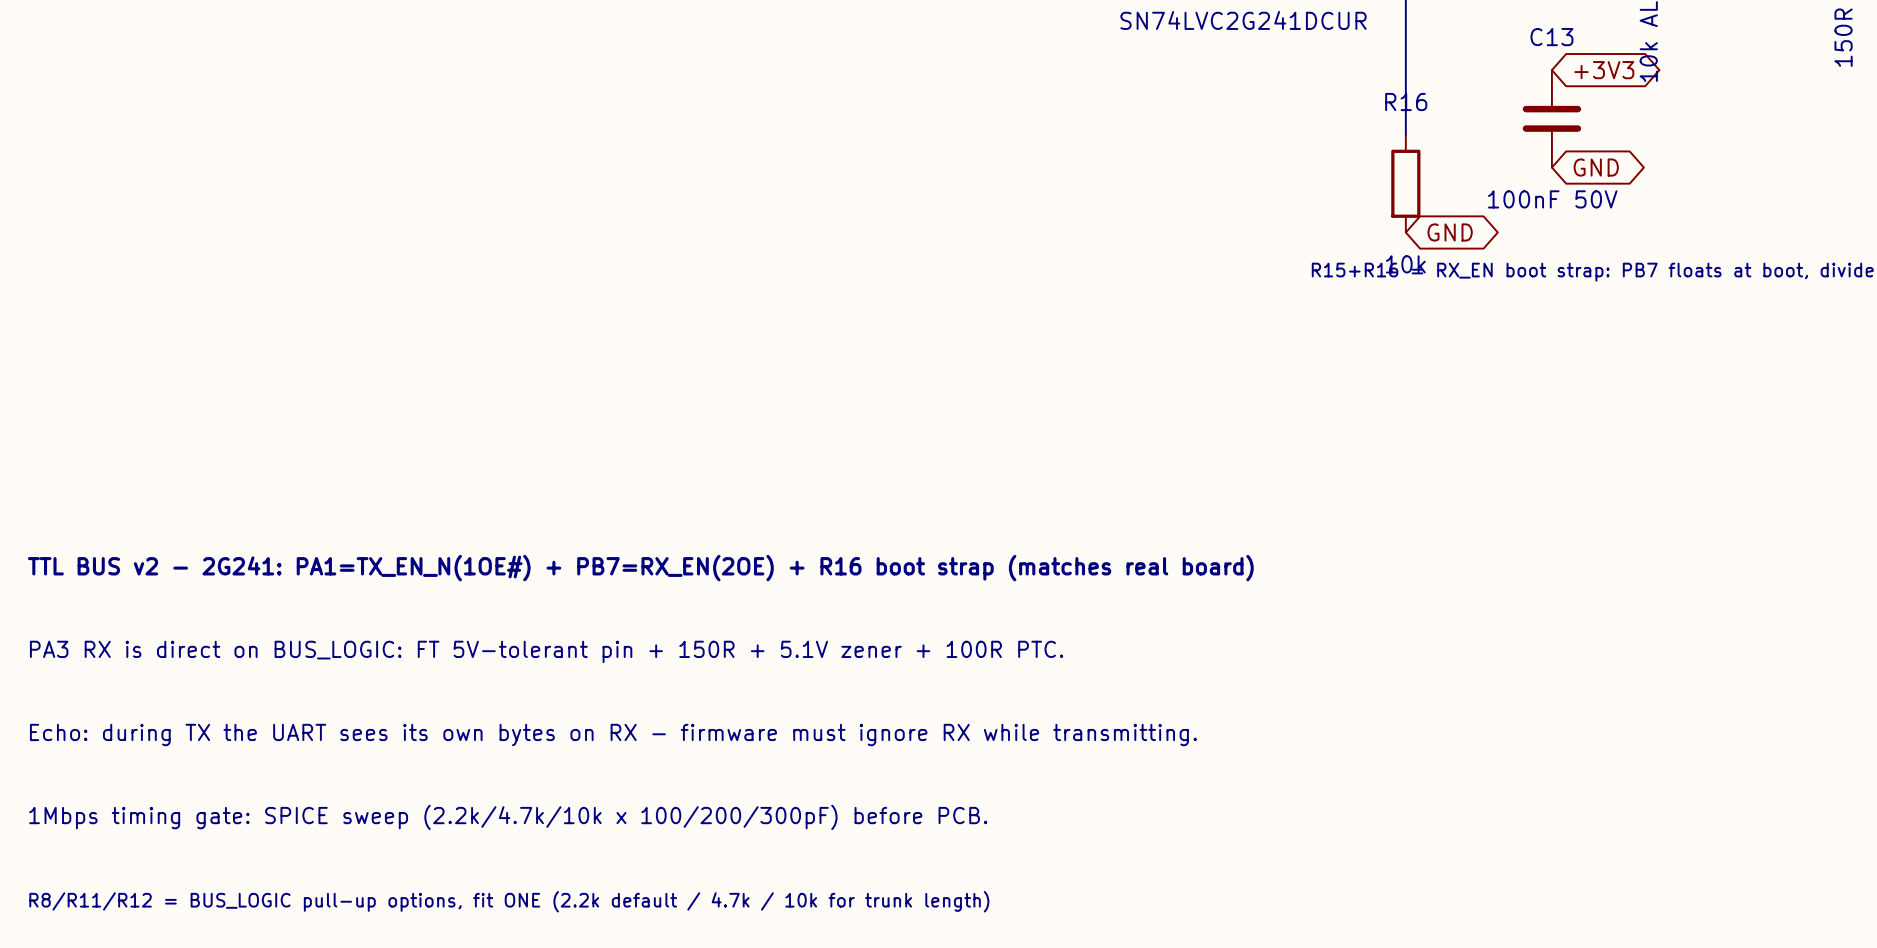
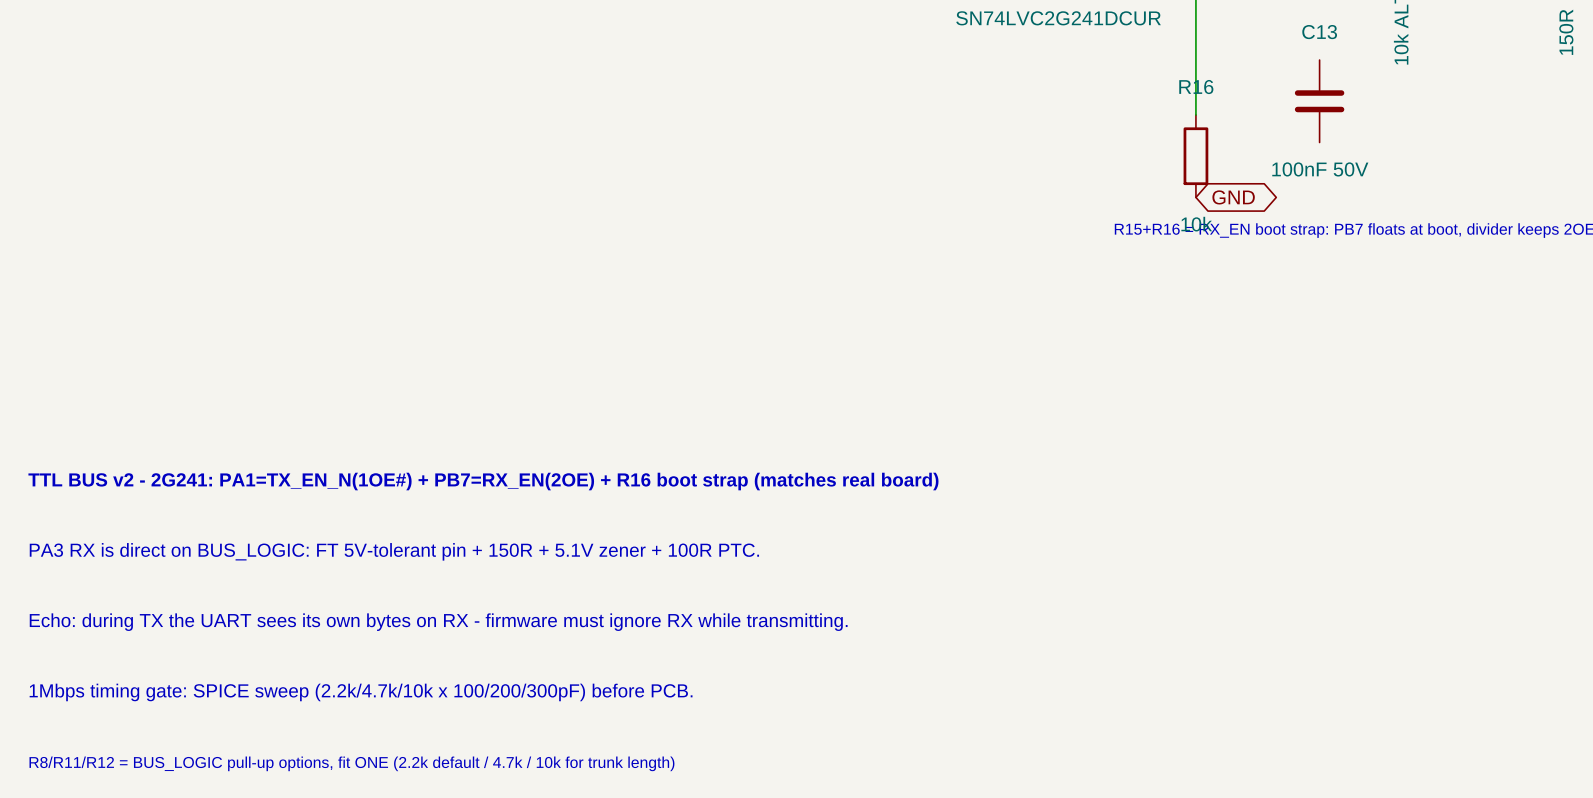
global label: +3V3 (1604, 70) -> none
global label: GND (1596, 167) -> none

